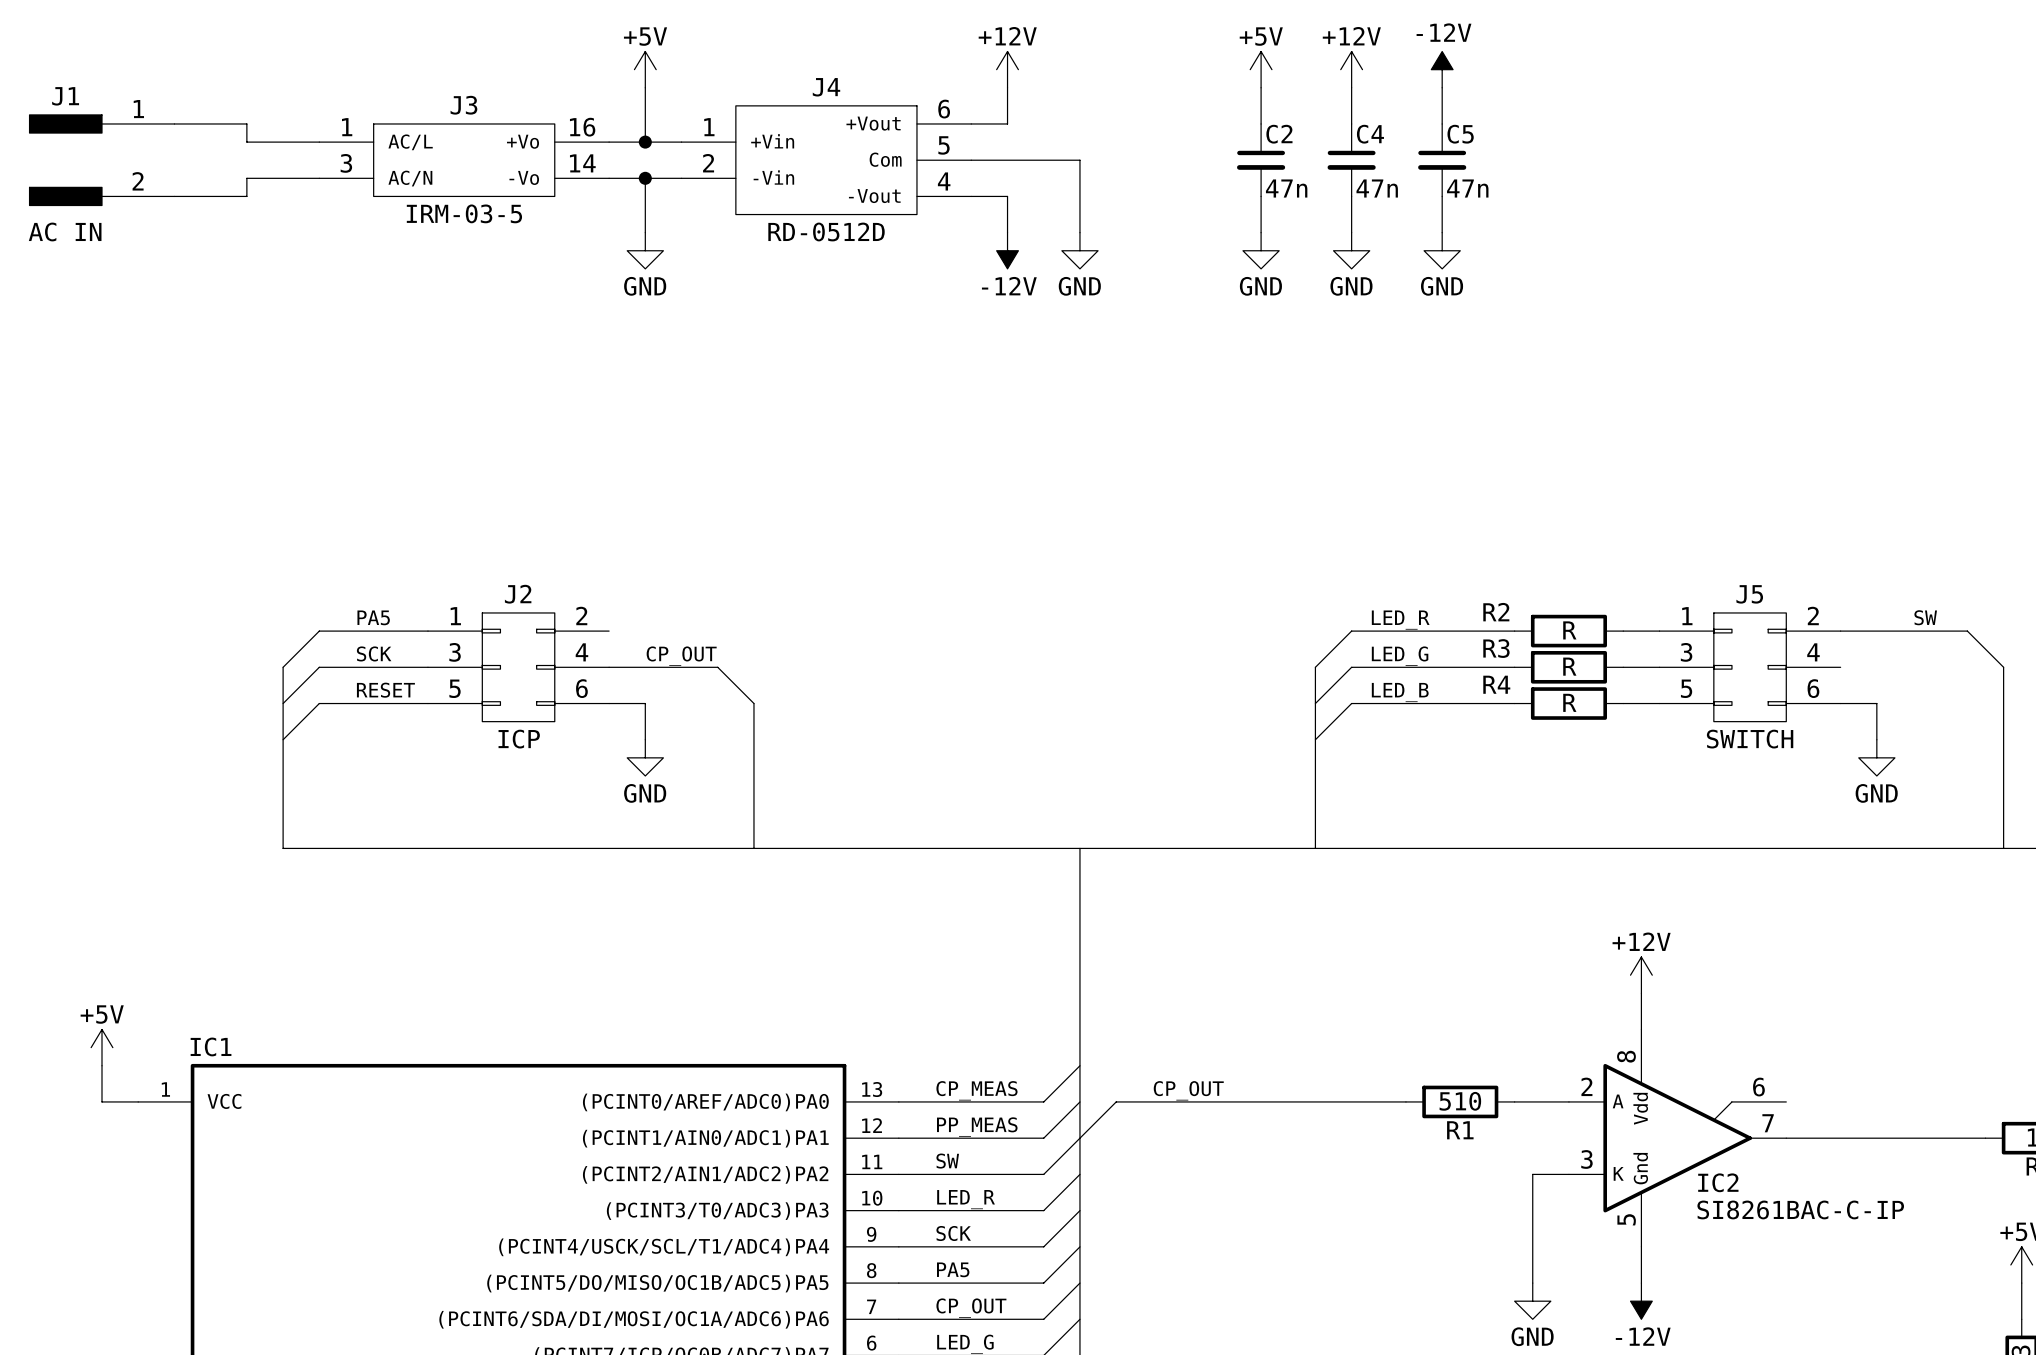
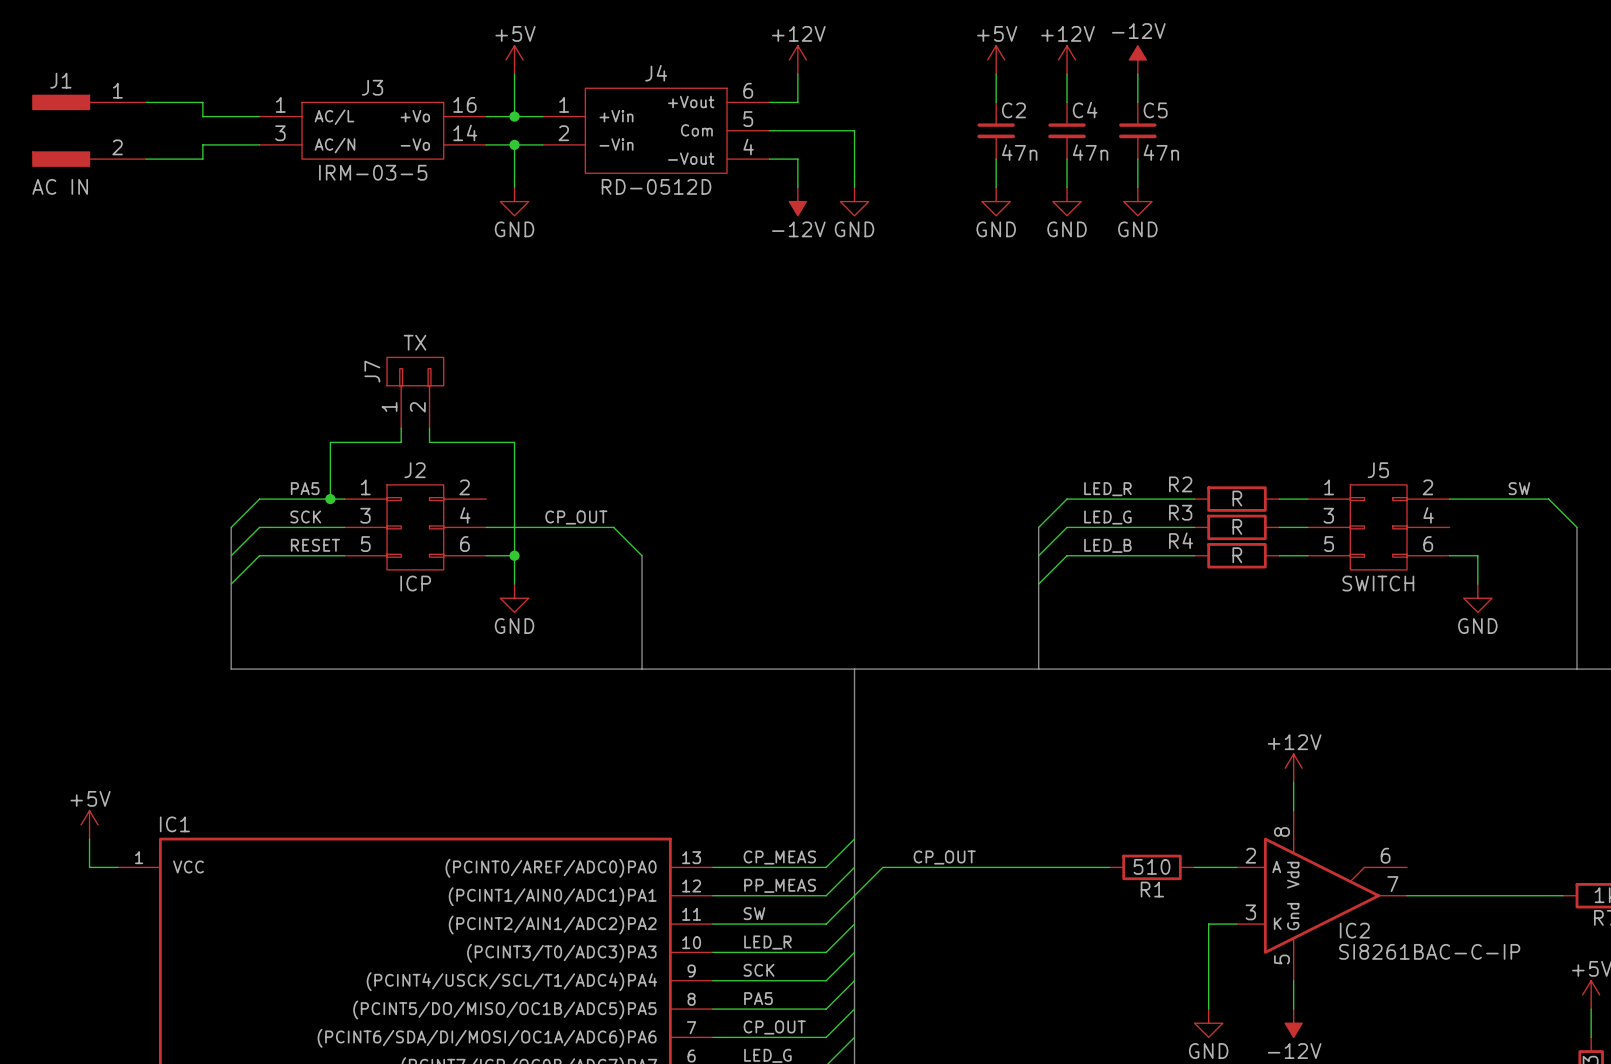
J7: none -> TX (415, 392)
wire: none -> (401, 428) (401, 442) (330, 442) (330, 499)
wire: none -> (429, 428) (429, 442) (514, 442) (514, 555)
junction: none -> (330, 499)
label position: CP_OUT (681, 656) -> CP_OUT (576, 517)
wire: (717, 667) (753, 703) -> (571, 527) (613, 527) (642, 555)
junction: none -> (514, 555)
bus: (753, 703) (753, 848) -> (642, 555) (642, 669)

